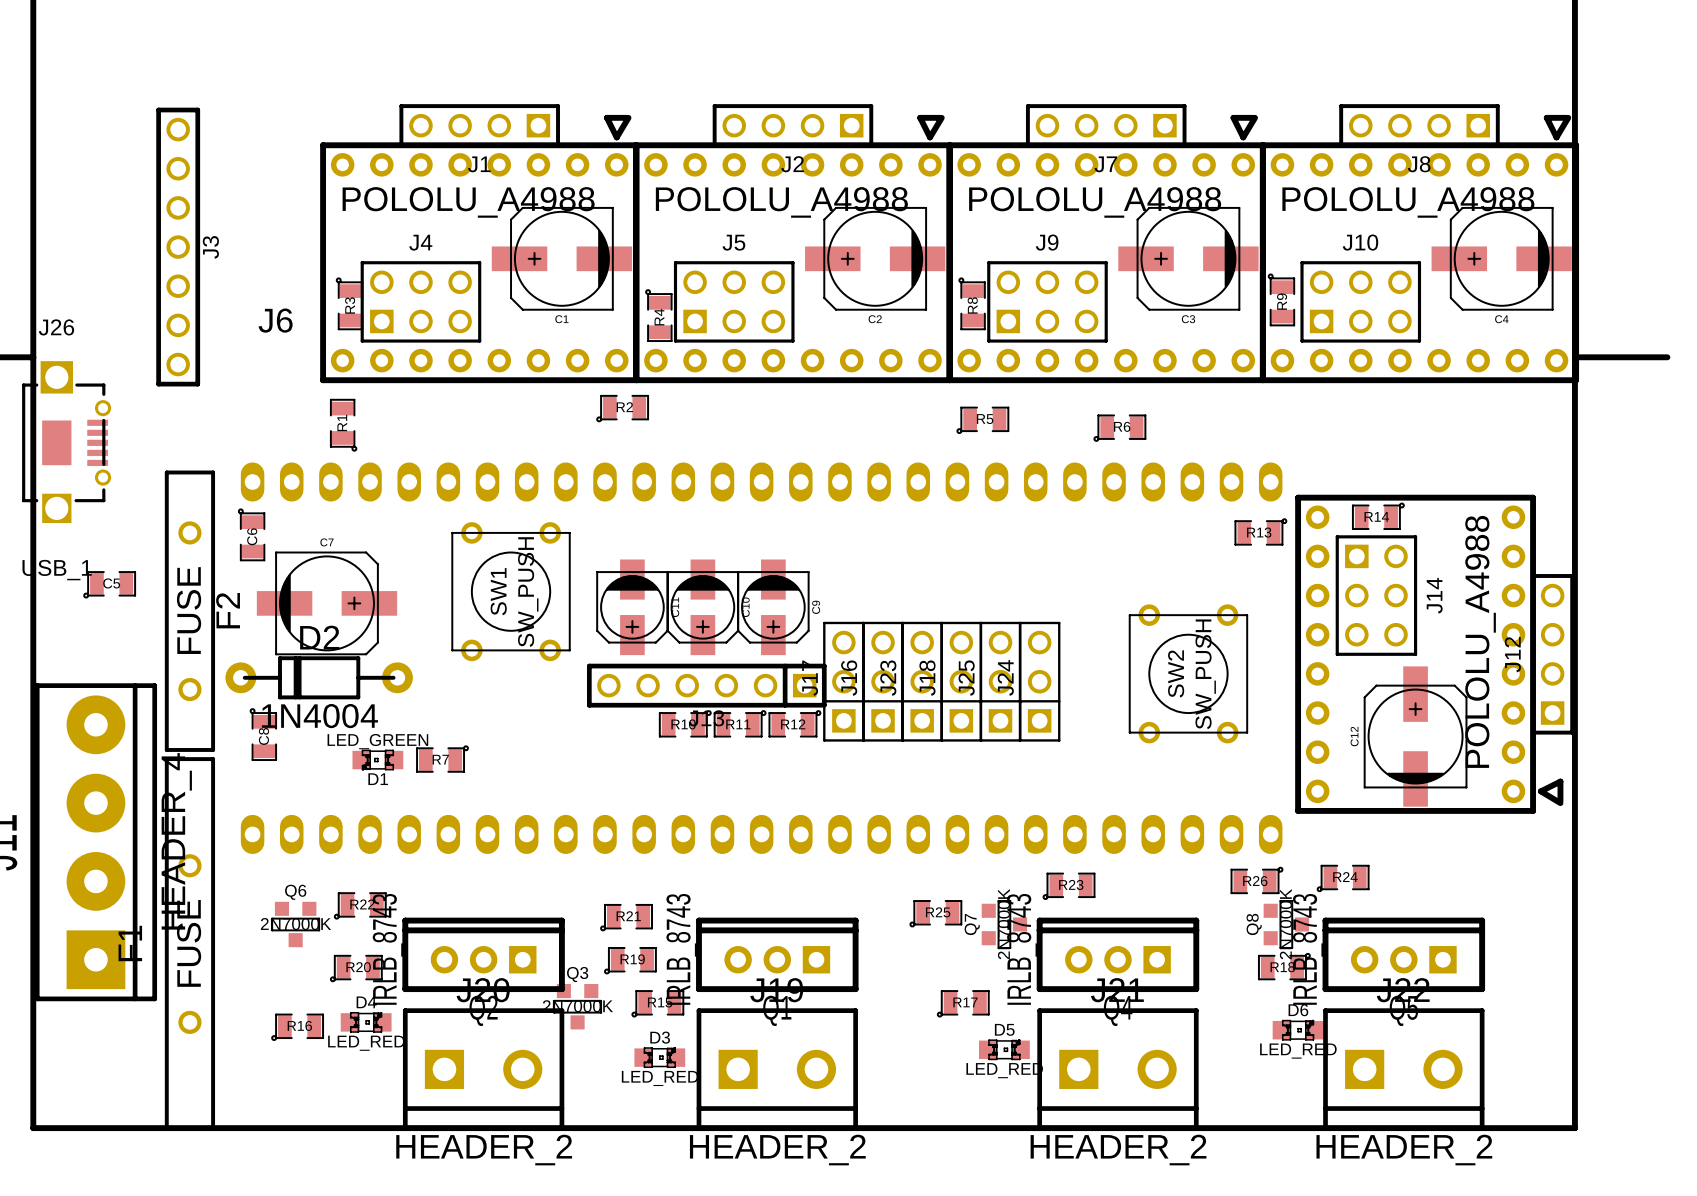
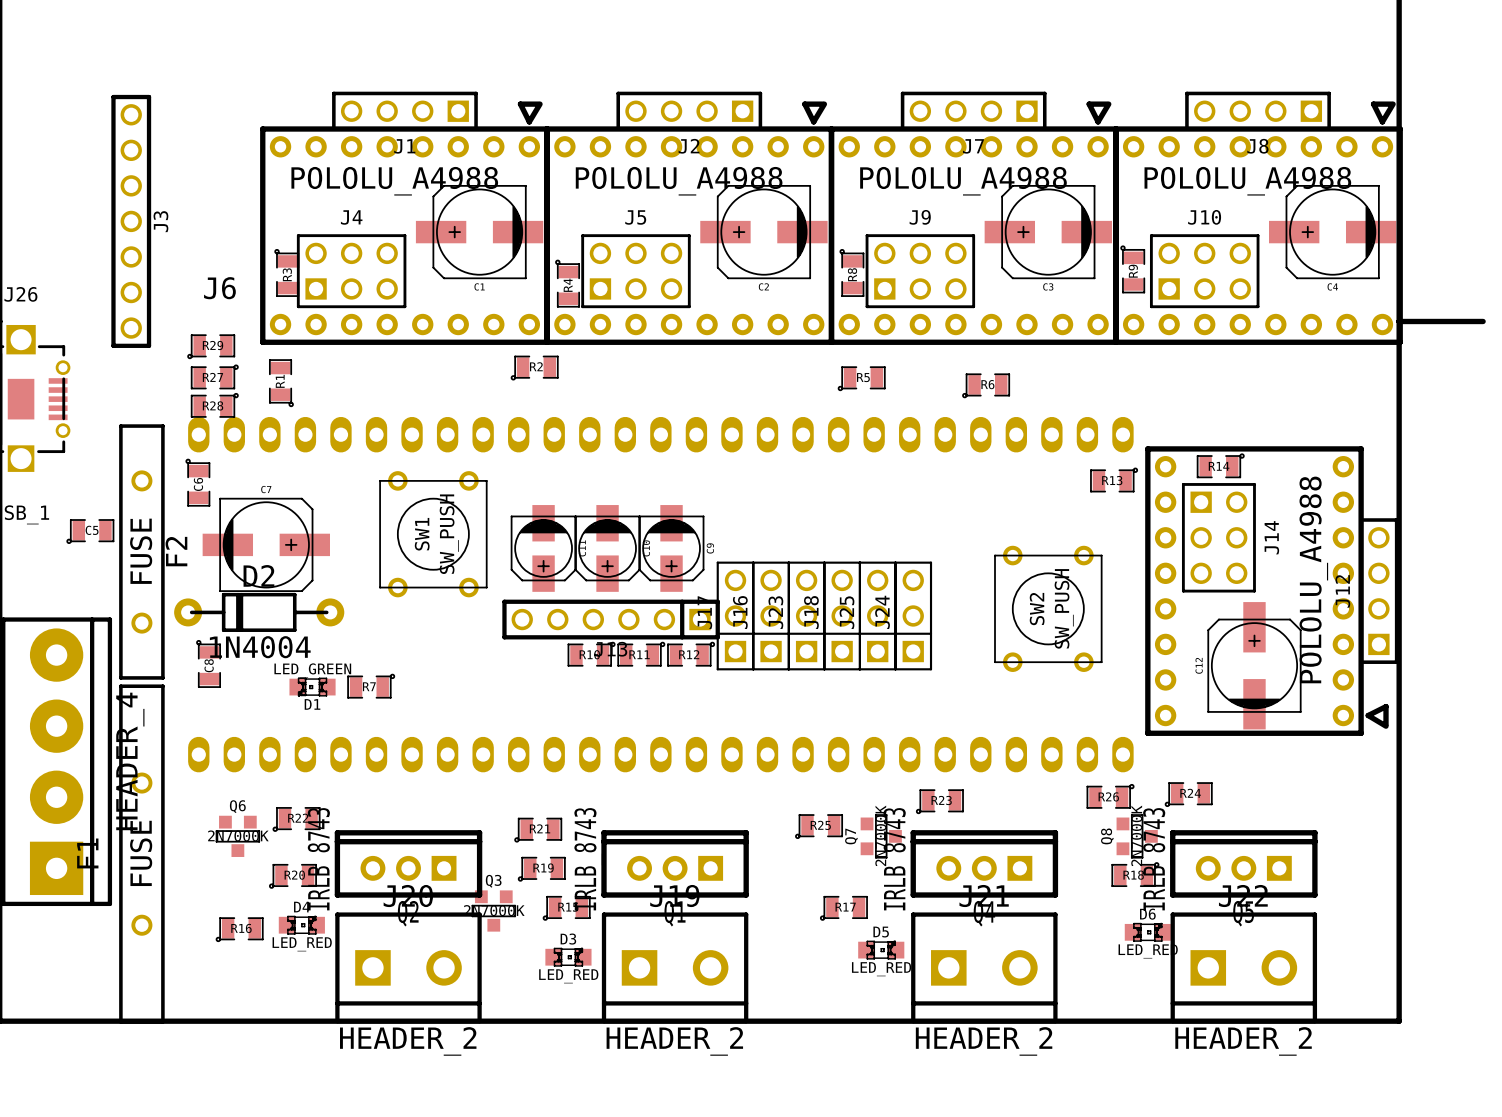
R29: none -> (211, 346)
R27: none -> (214, 376)
R28: none -> (214, 405)
C5 position: (109, 584) -> (90, 531)

